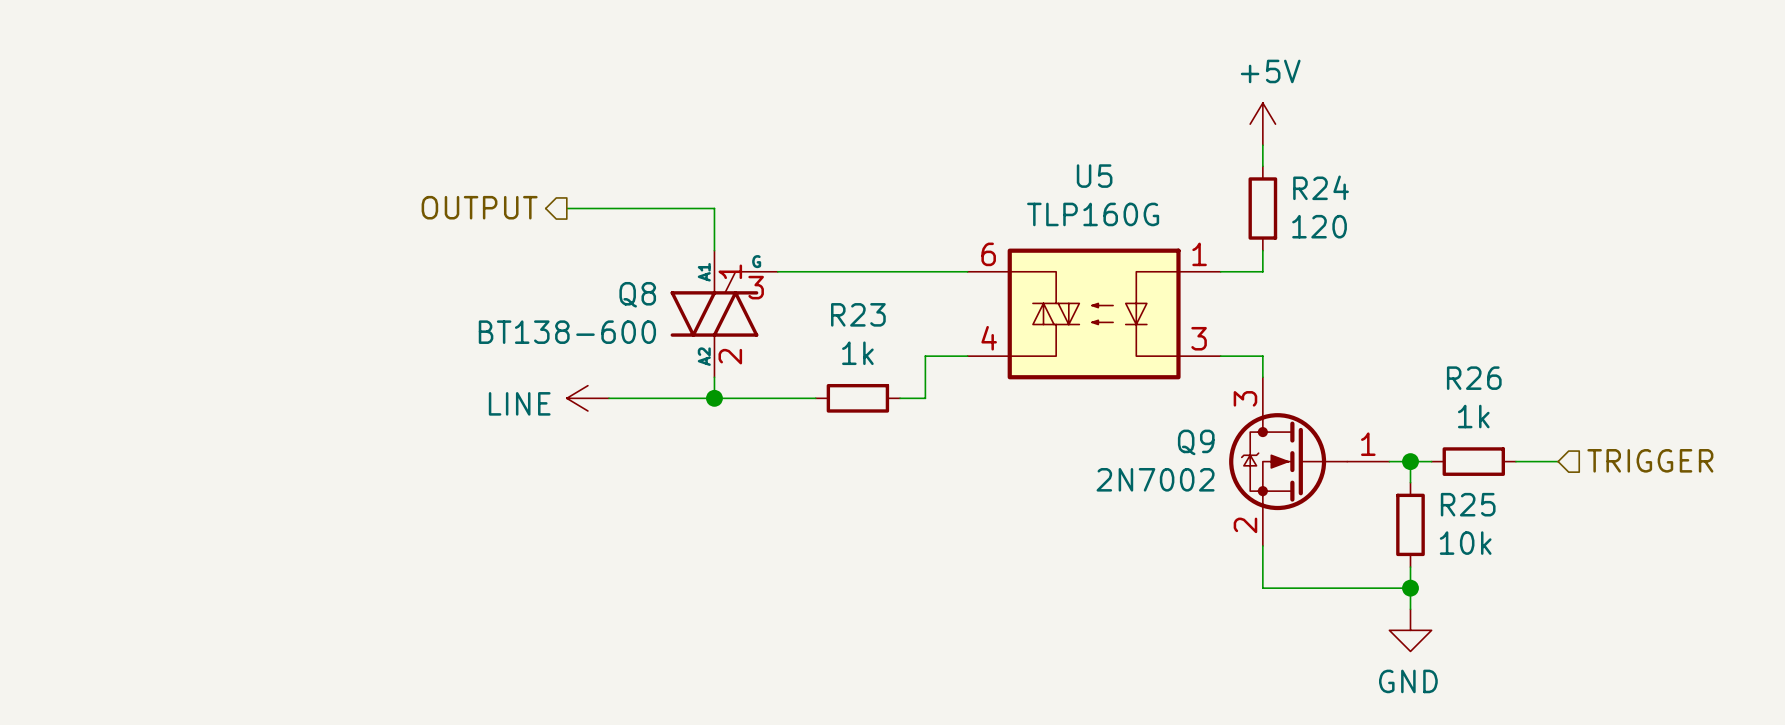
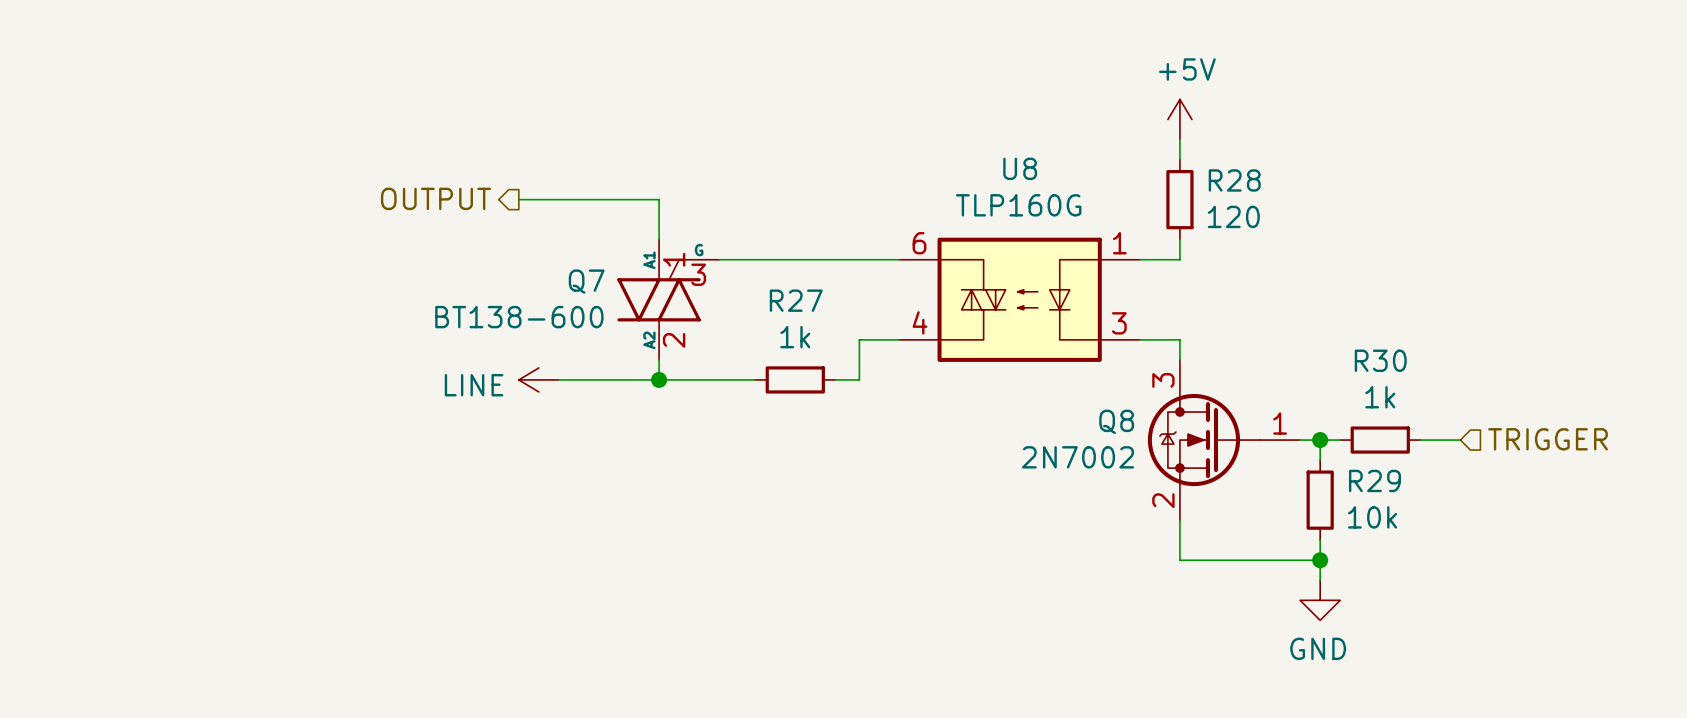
U5 name: U5 (1094, 176) -> U8 (1020, 168)
R24 name: R24 (1321, 187) -> R28 (1234, 180)
Q8 name: Q8 (637, 294) -> Q7 (586, 281)
R23 name: R23 (858, 314) -> R27 (796, 300)
R26 name: R26 (1474, 378) -> R30 (1380, 360)
Q9 name: Q9 (1196, 442) -> Q8 (1116, 421)
R25 name: R25 (1468, 504) -> R29 (1374, 480)

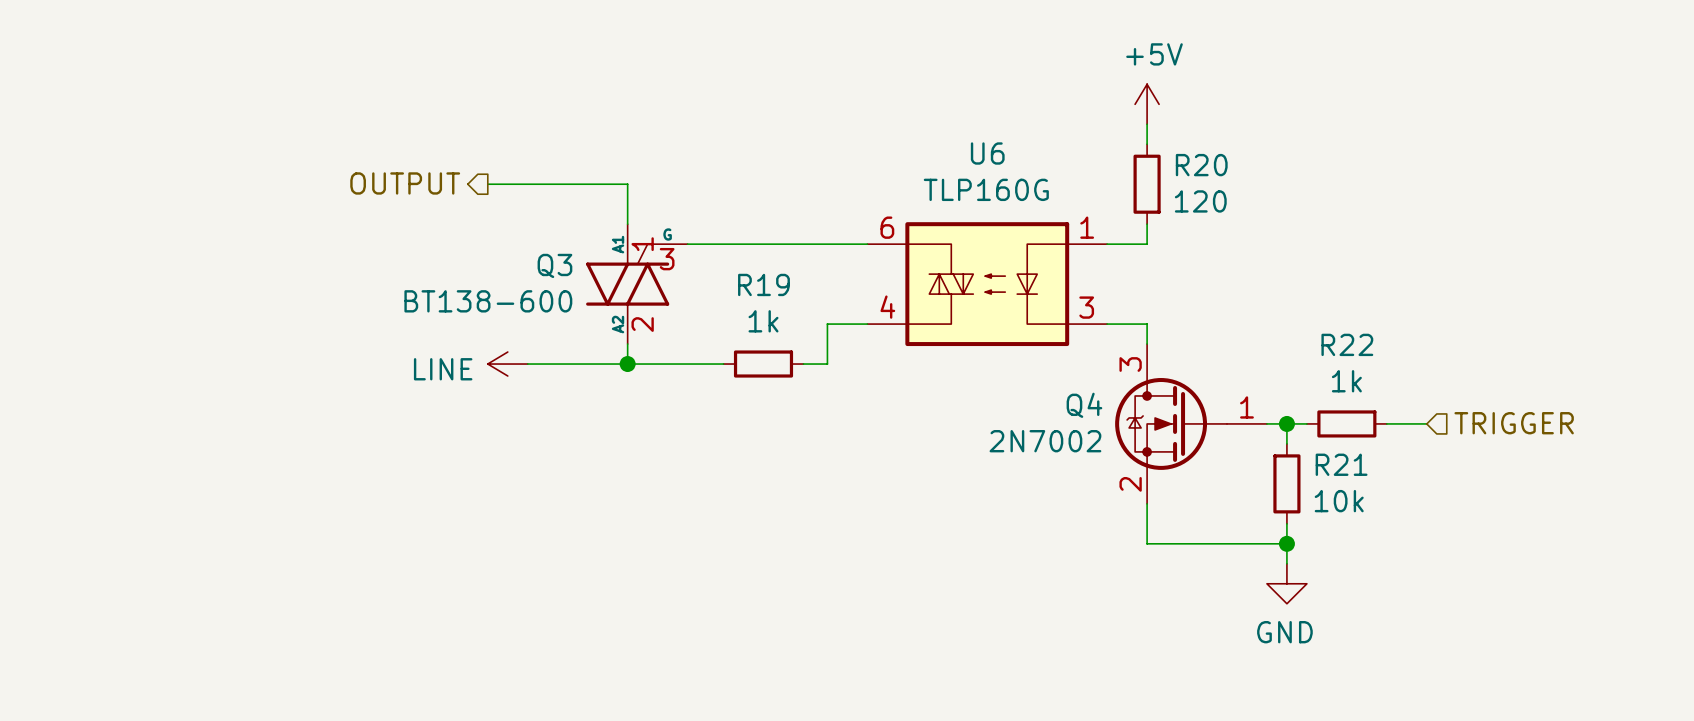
U8 name: U8 (1020, 168) -> U6 (987, 153)
R28 name: R28 (1234, 180) -> R20 (1201, 165)
Q7 name: Q7 (586, 281) -> Q3 (554, 265)
R27 name: R27 (796, 300) -> R19 (763, 284)
R30 name: R30 (1380, 360) -> R22 (1347, 344)
Q8 name: Q8 (1116, 421) -> Q4 (1084, 405)
R29 name: R29 (1374, 480) -> R21 (1341, 464)

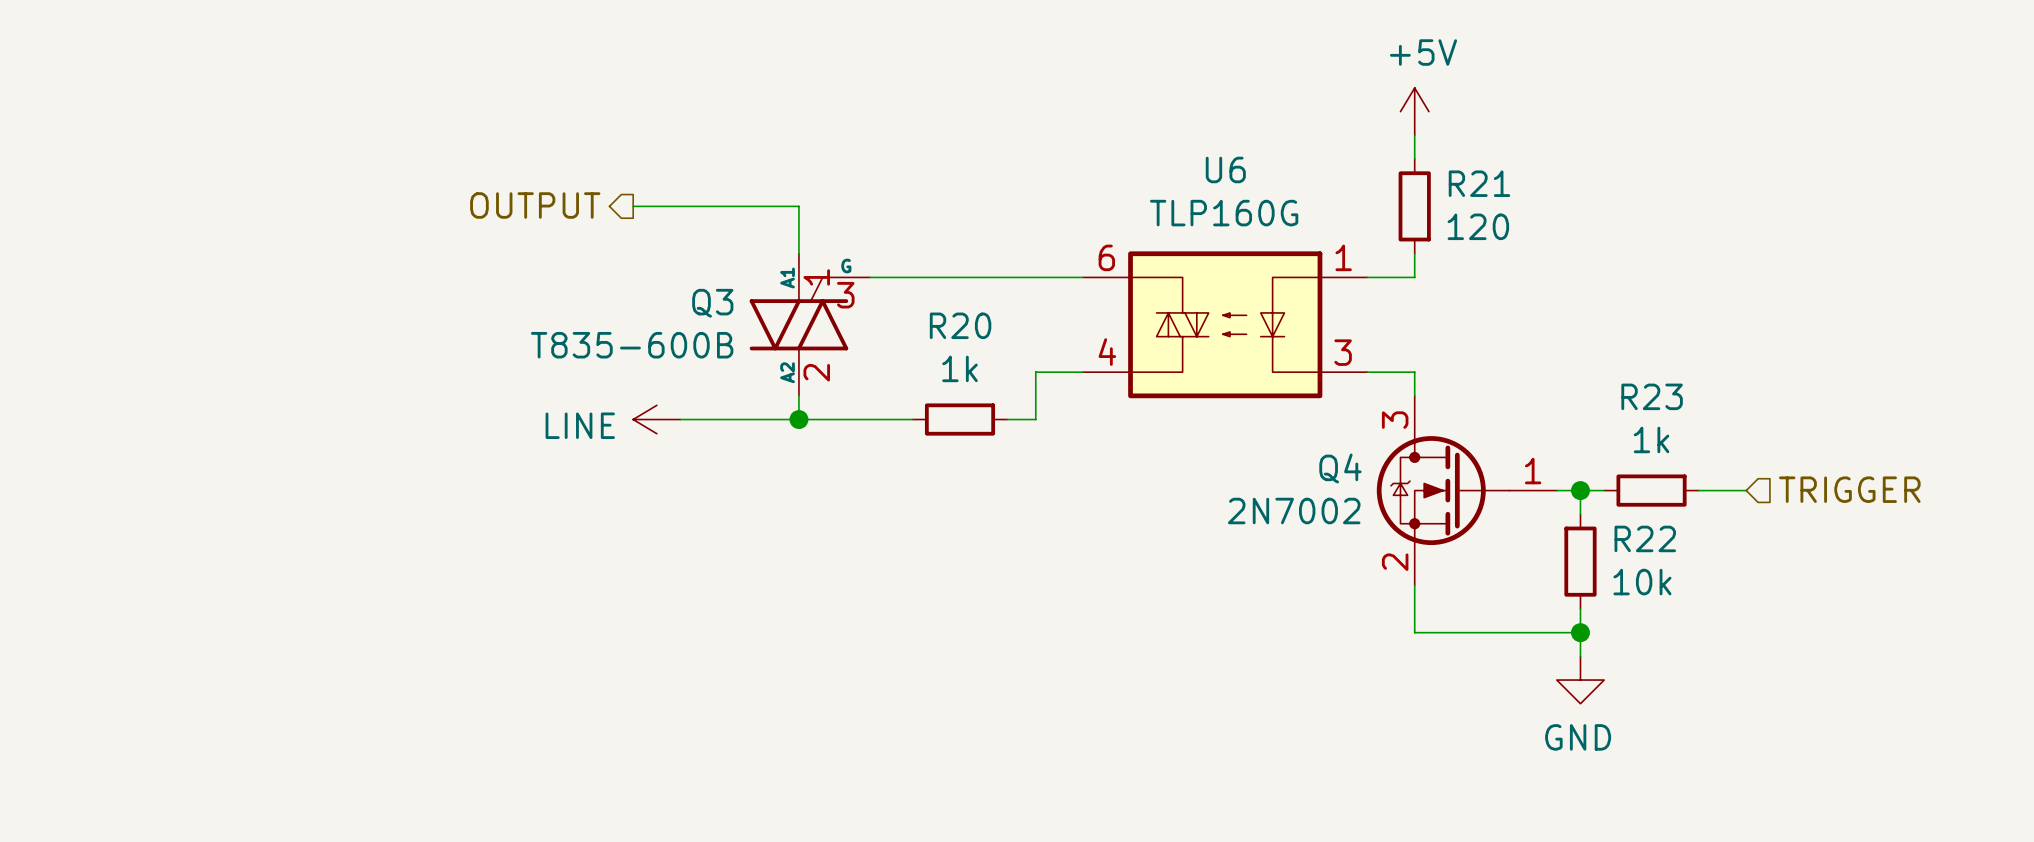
R20 name: R20 (1201, 165) -> R21 (1479, 183)
R19 name: R19 (763, 284) -> R20 (960, 325)
Q3 value: BT138-600 (488, 301) -> T835-600B (632, 345)
R22 name: R22 (1347, 344) -> R23 (1652, 396)
R21 name: R21 (1341, 464) -> R22 (1645, 538)

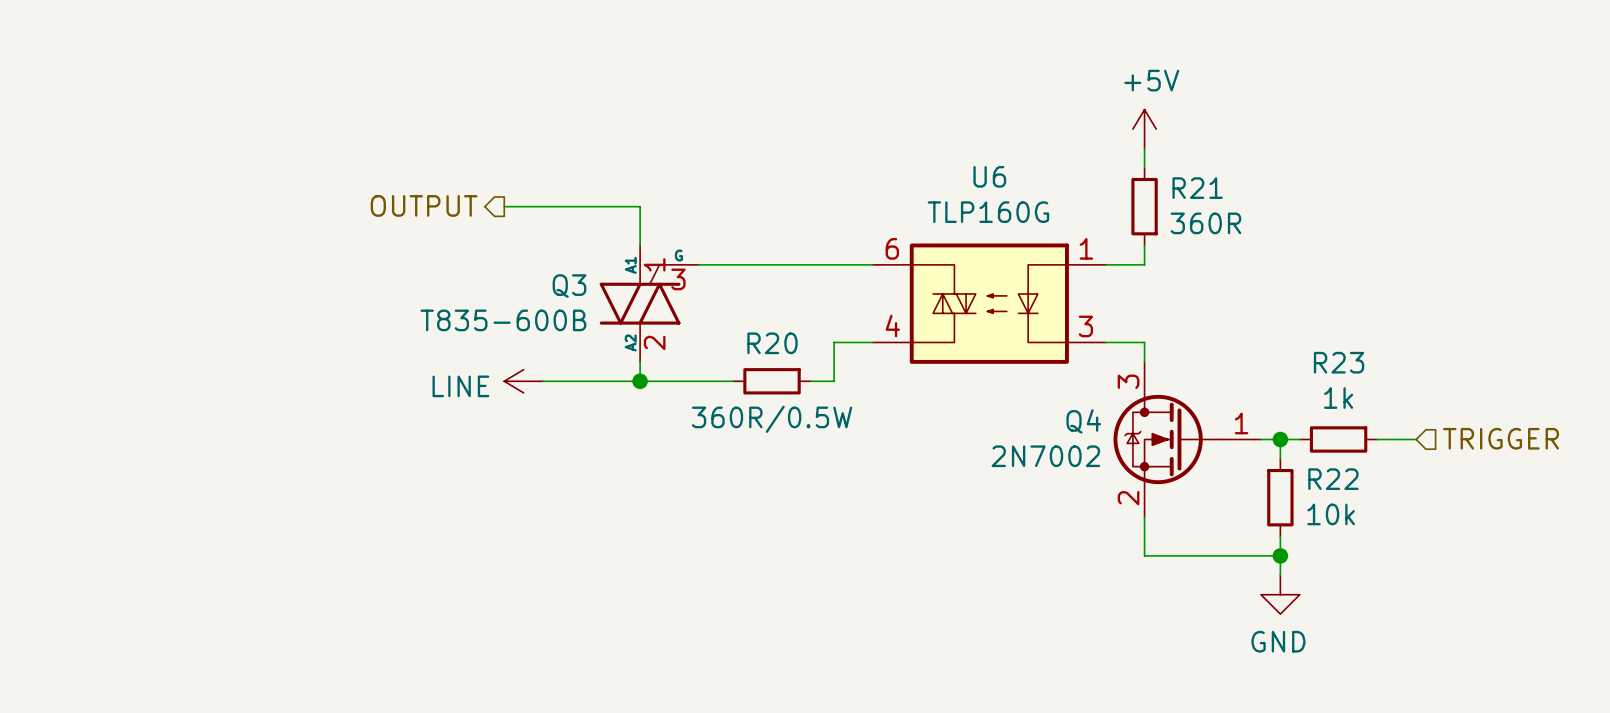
R21 value: 120 (1478, 226) -> 360R (1205, 223)
R20 name position: R20 (960, 325) -> R20 (772, 343)
R20 value: 1k (960, 368) -> 360R/0.5W (772, 419)

